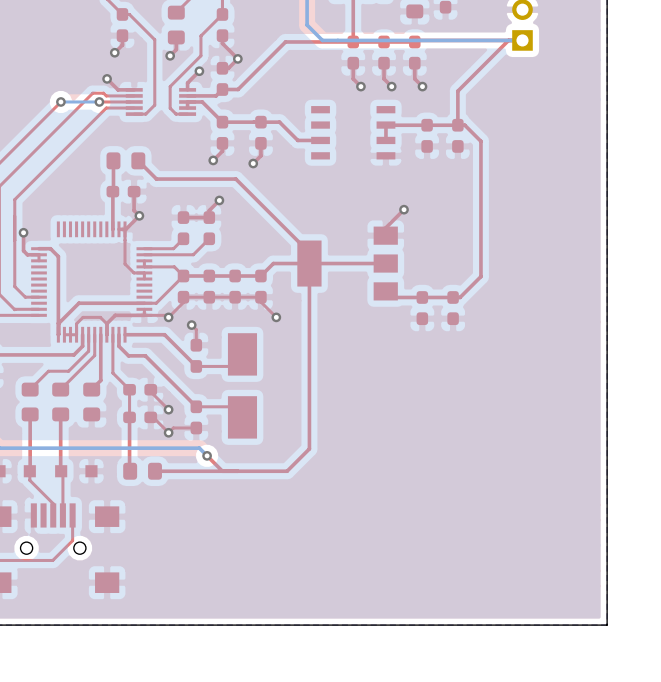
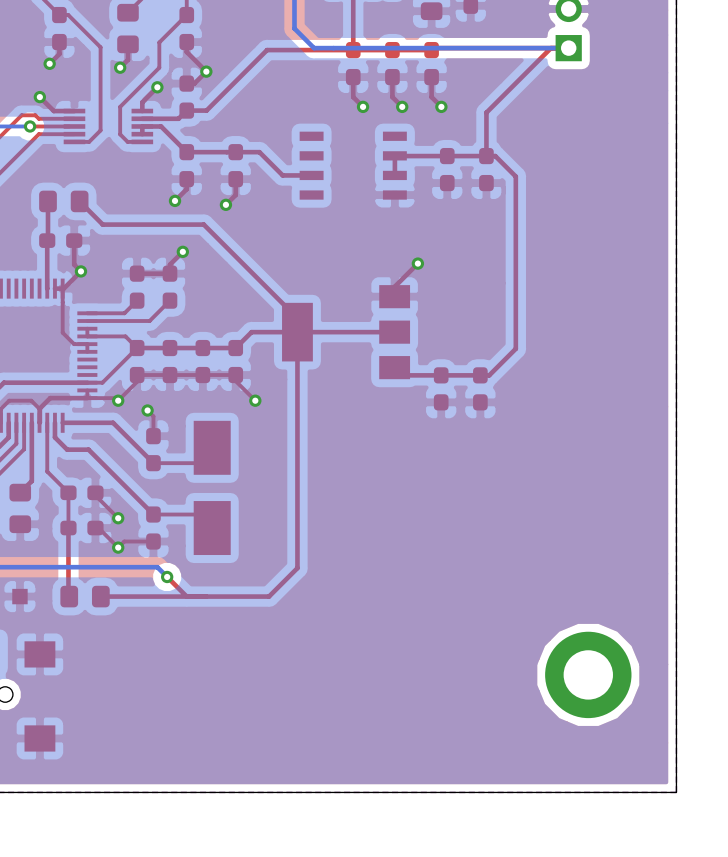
part: none -> (588, 674)

